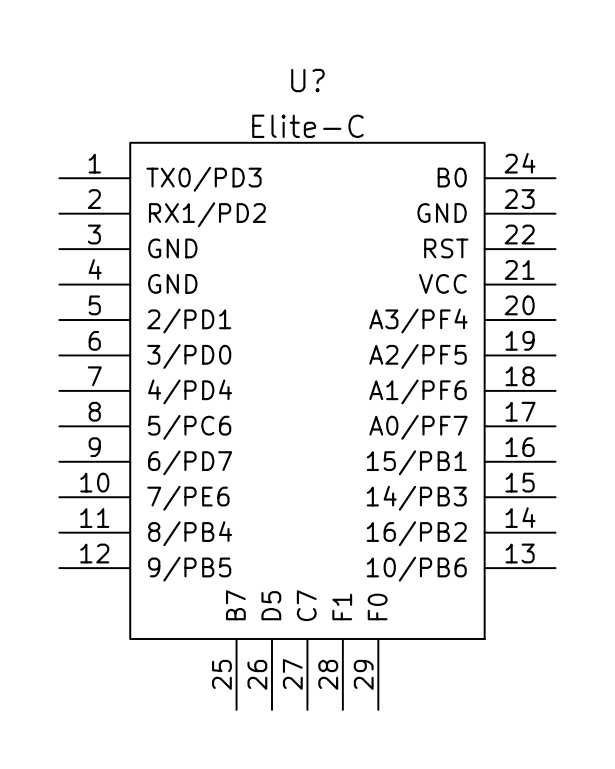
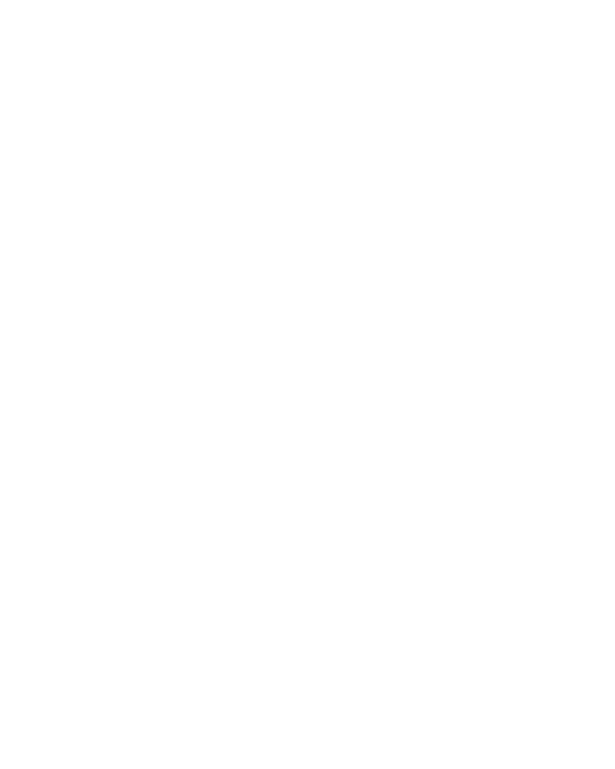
U?: Elite-C (307, 426) -> none

